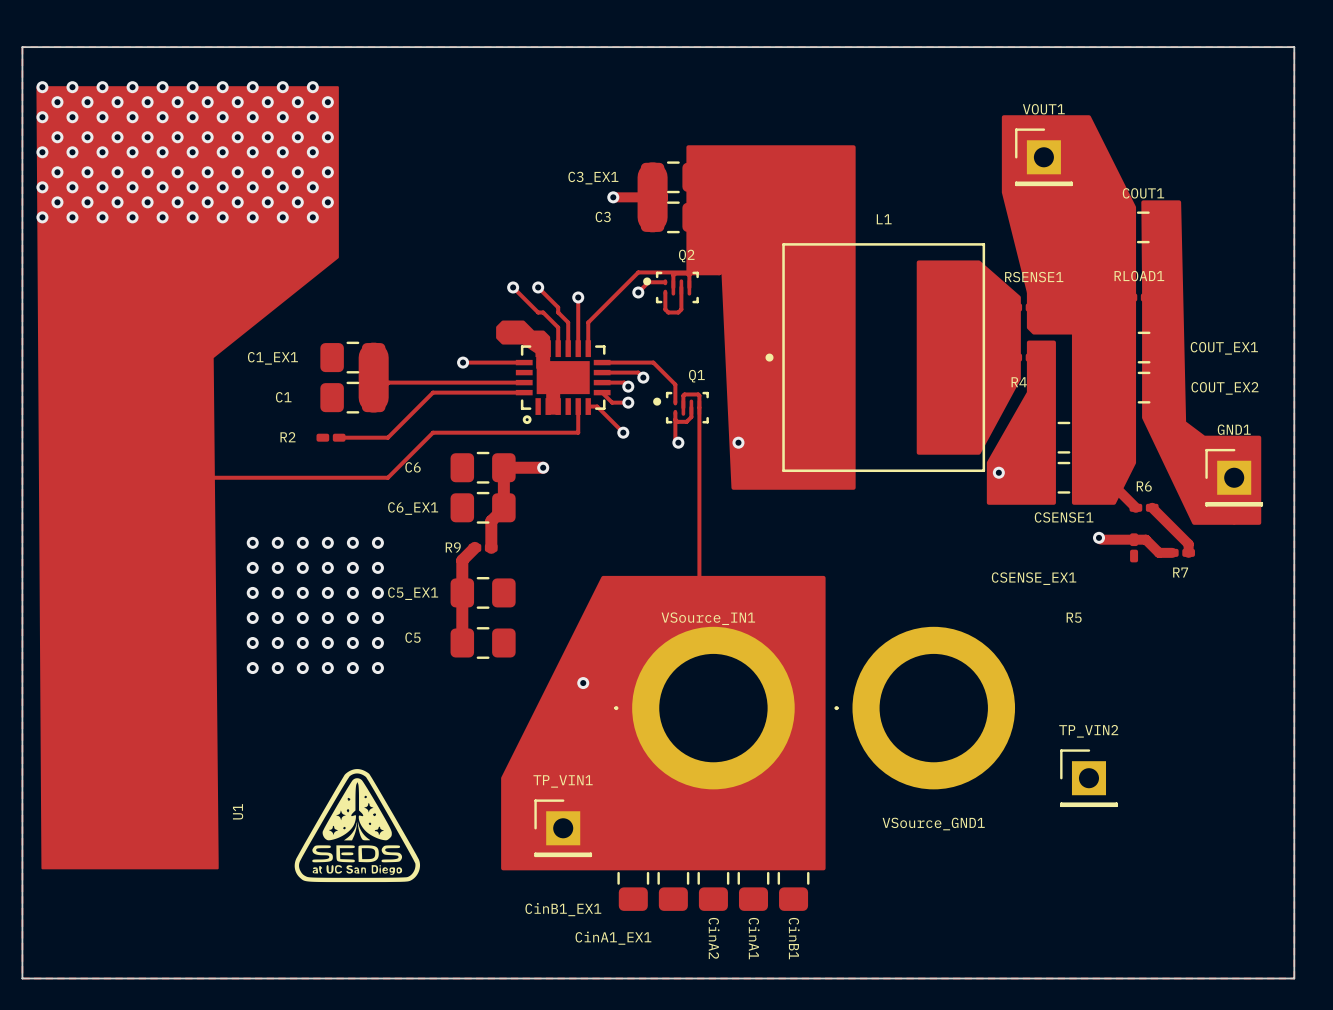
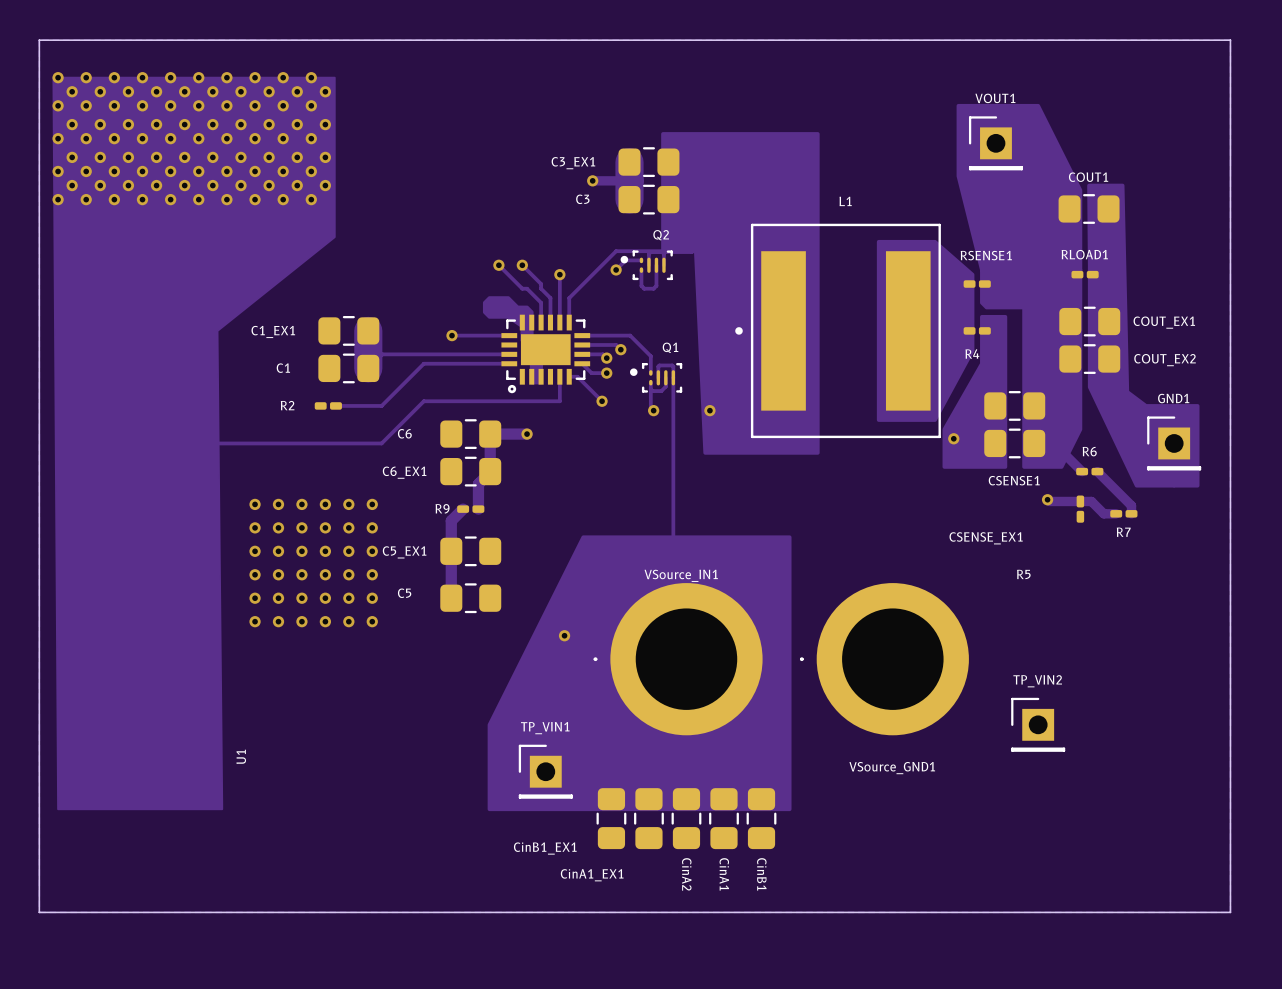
drawing: [294, 769, 421, 883] -> none

